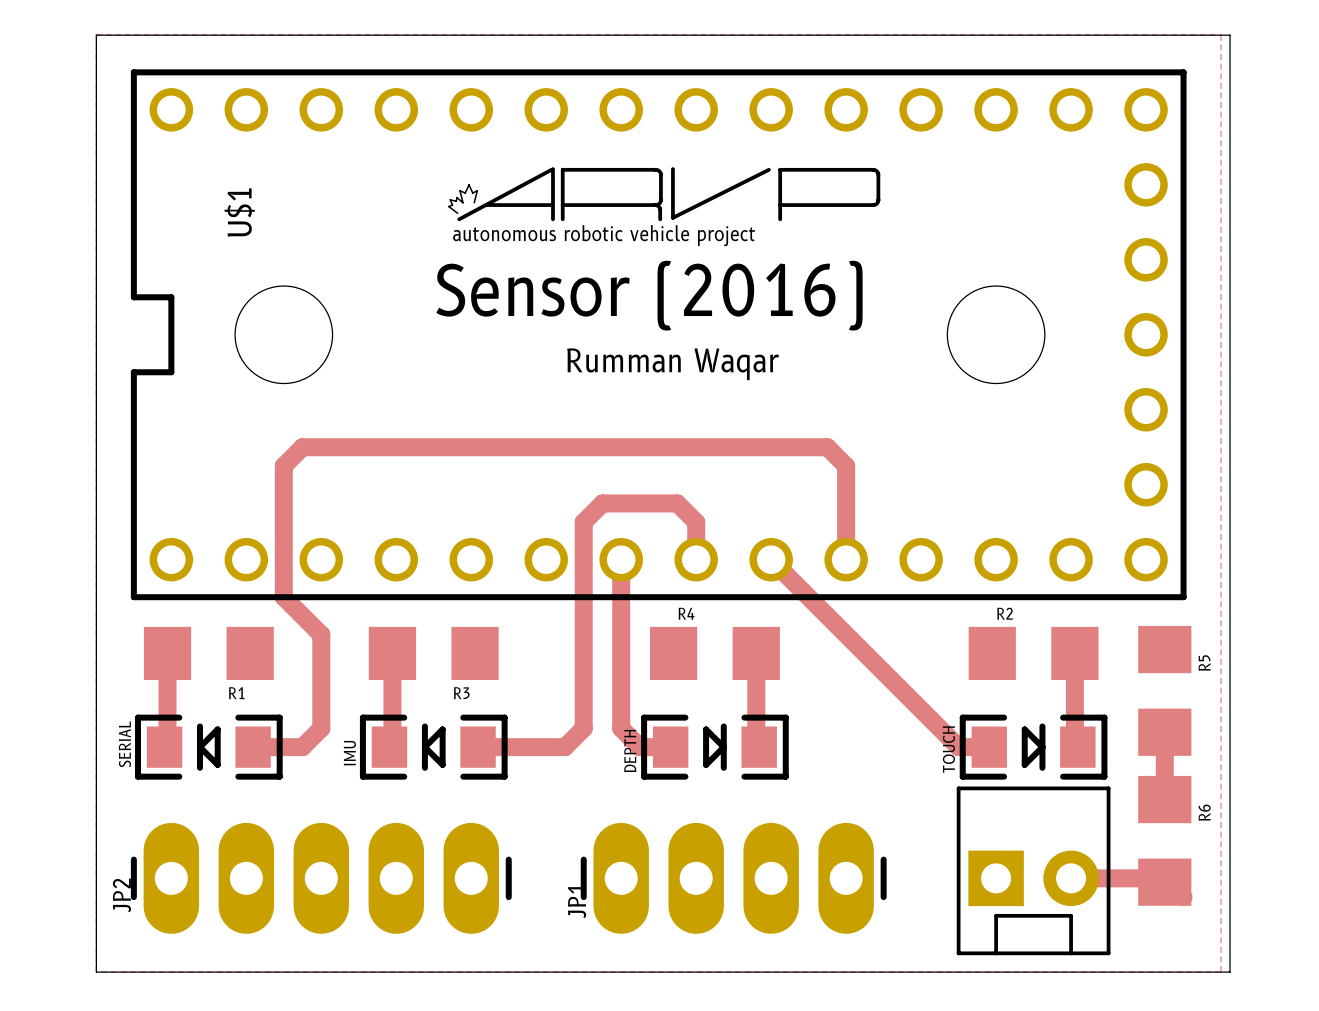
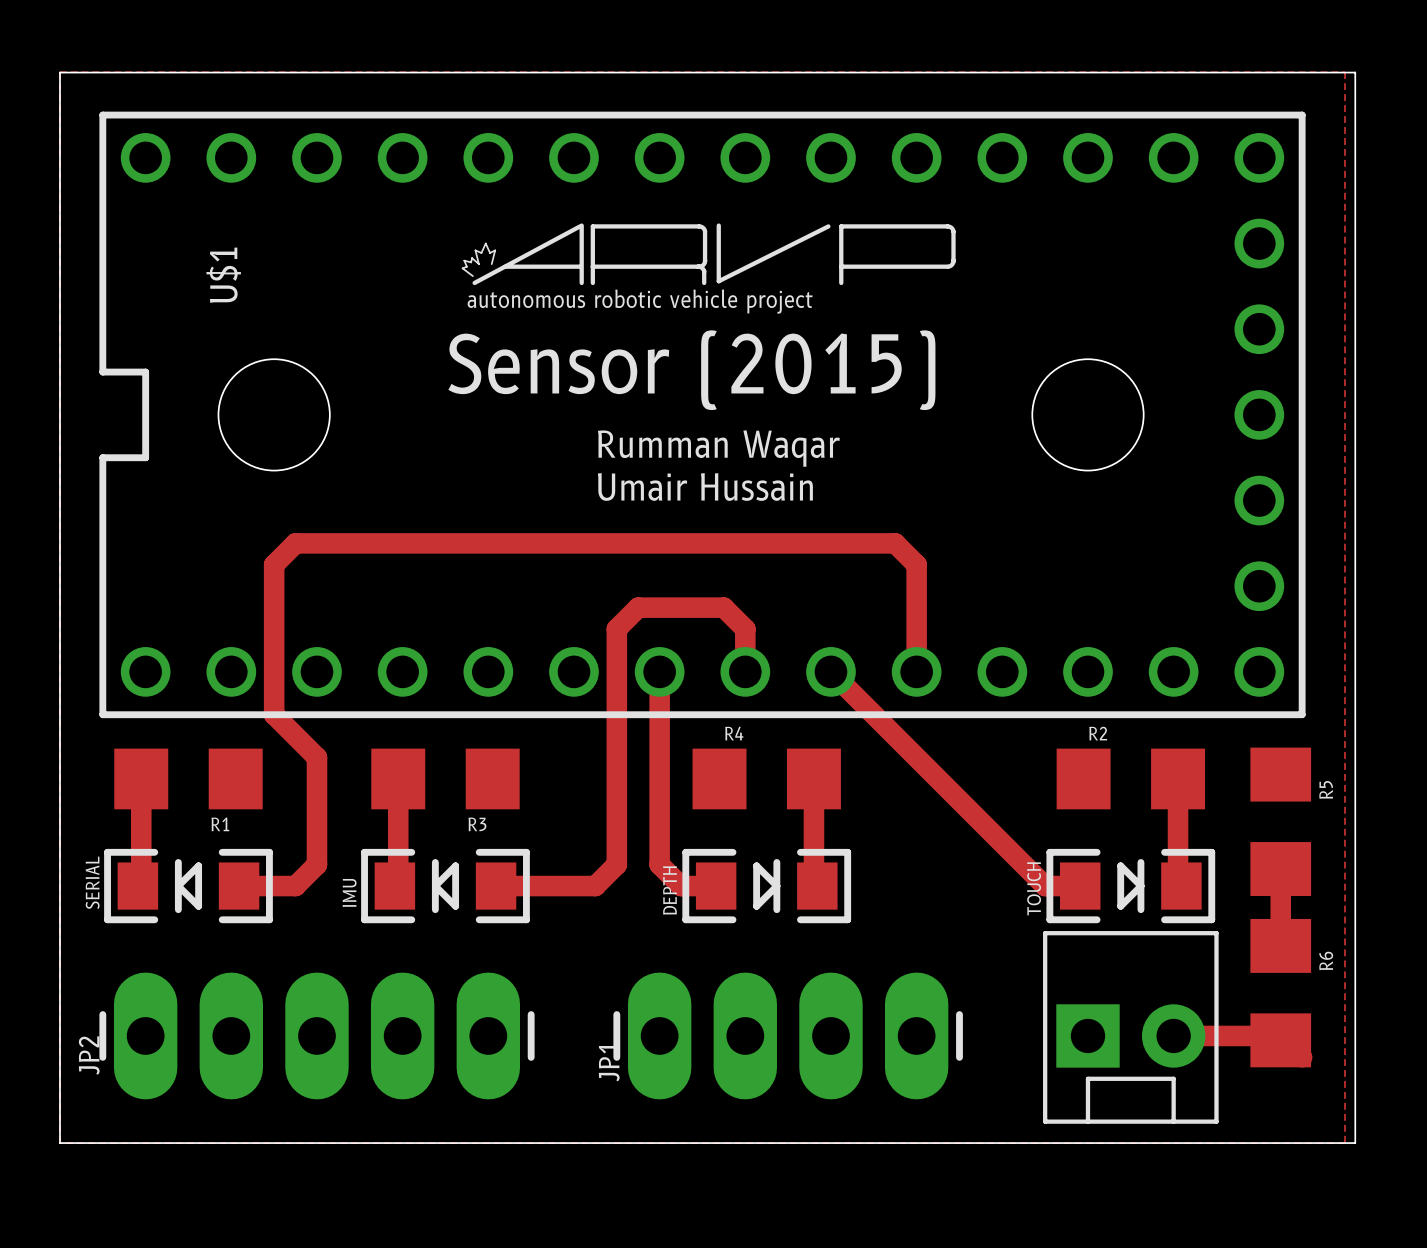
text: Sensor (2016) (649, 295) -> Sensor (2015) (691, 370)
text: none -> Umair Hussain (705, 487)

